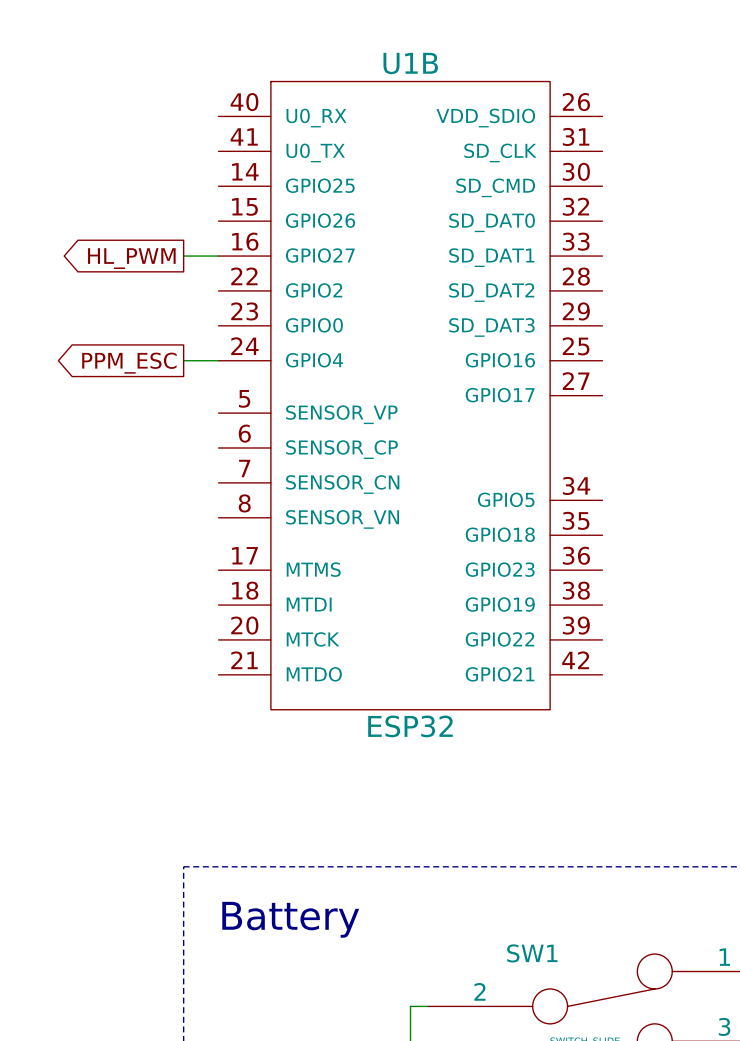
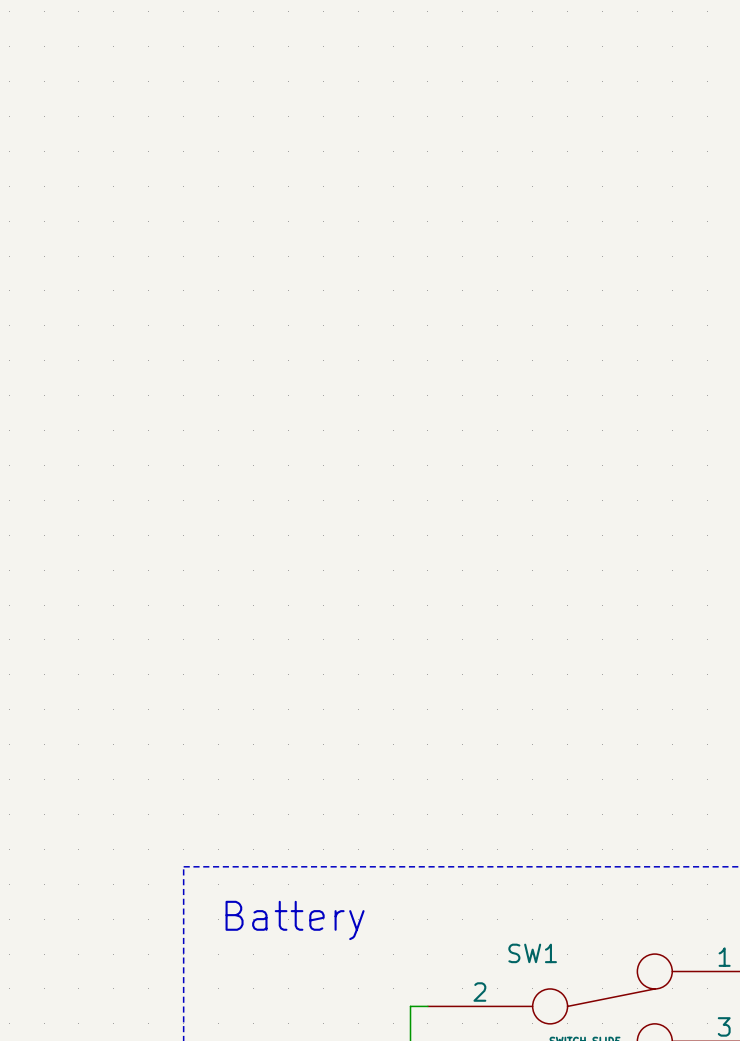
wire: (183, 256) (218, 256) -> none
global label: HL_PWM (131, 258) -> none
wire: (183, 360) (218, 360) -> none
global label: PPM_ESC (129, 363) -> none
U1B: ESP32 (410, 395) -> none

